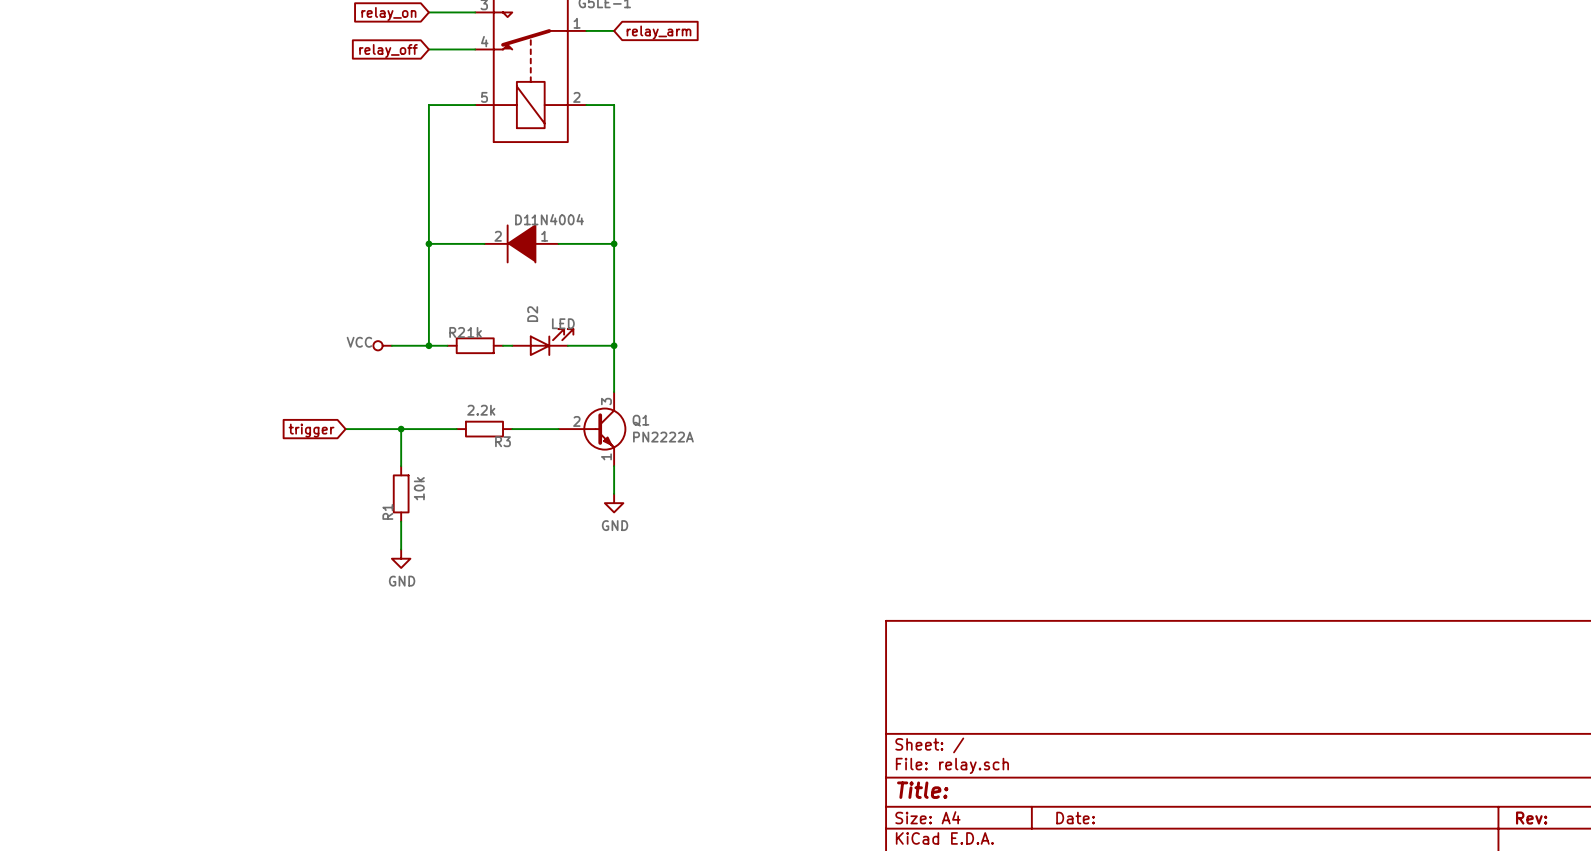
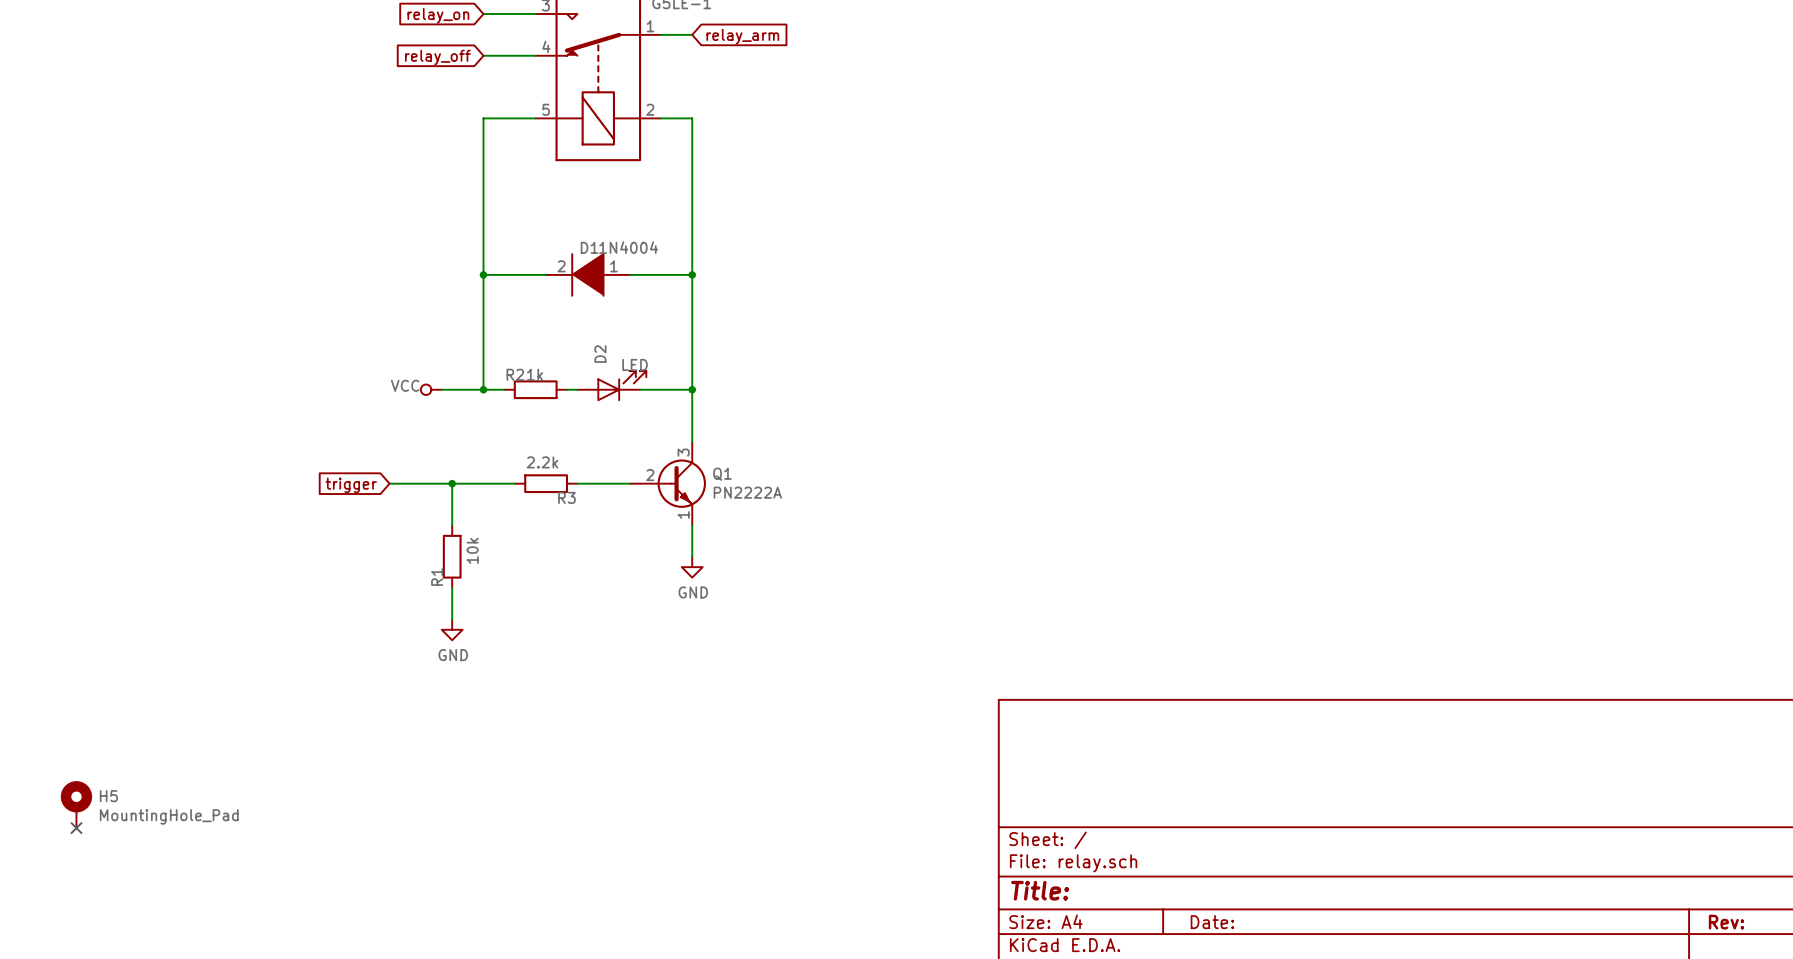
H5: none -> MountingHole_Pad (76, 804)
no-connect mark: none -> (76, 828)

